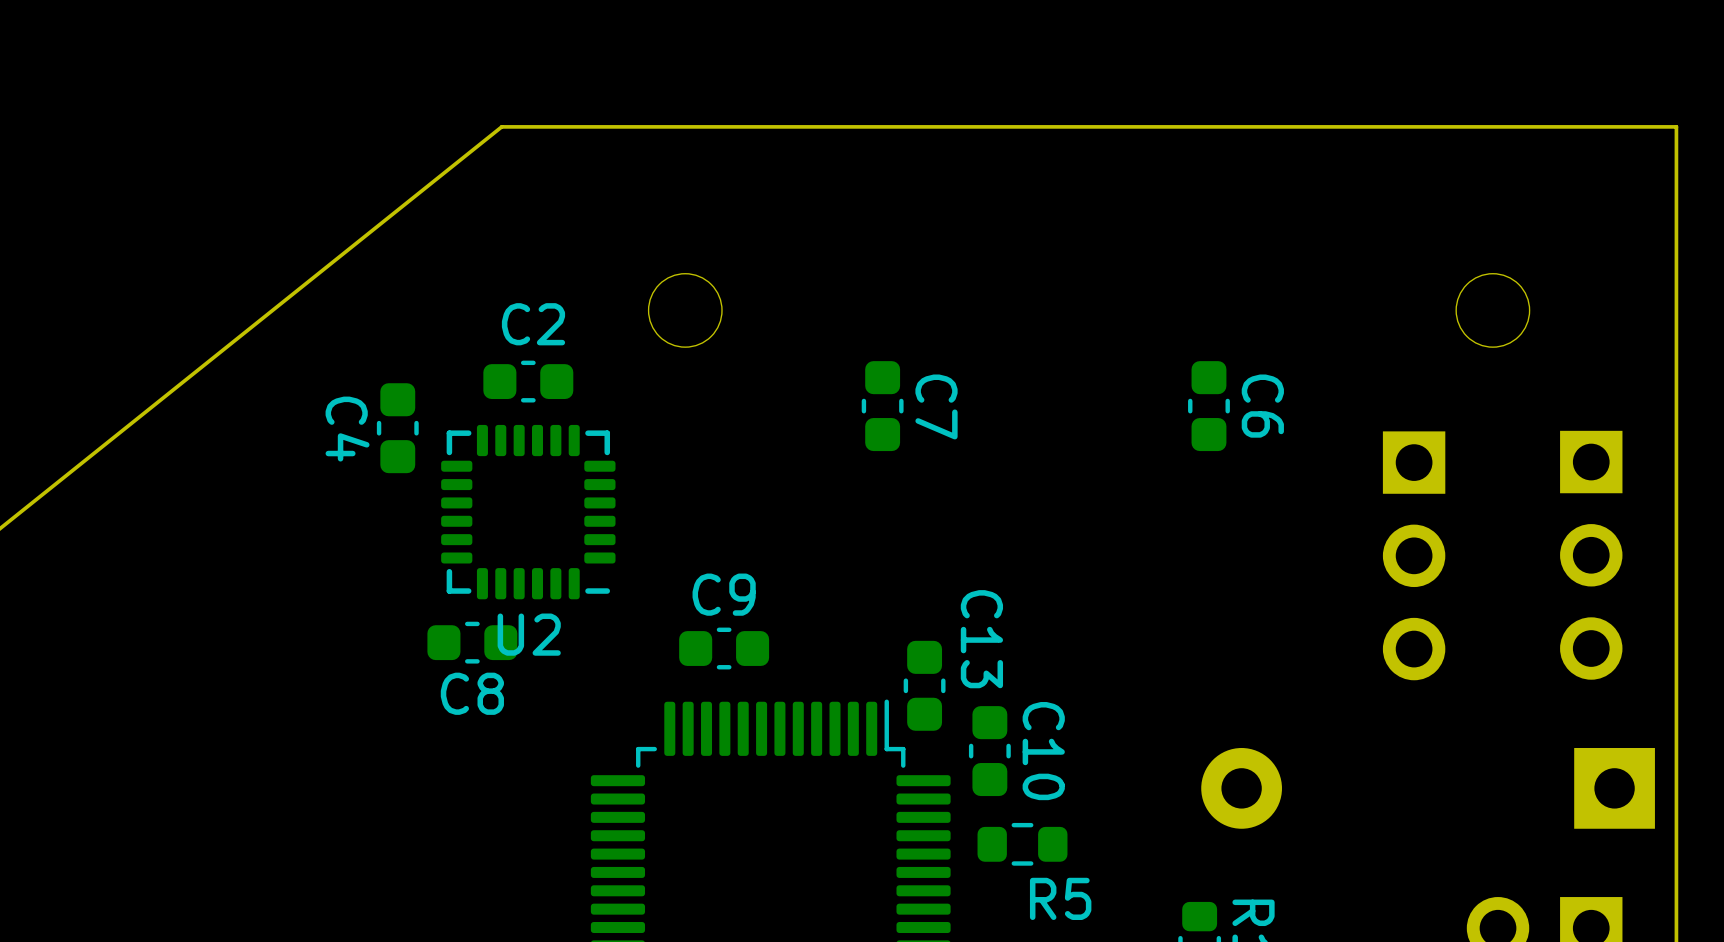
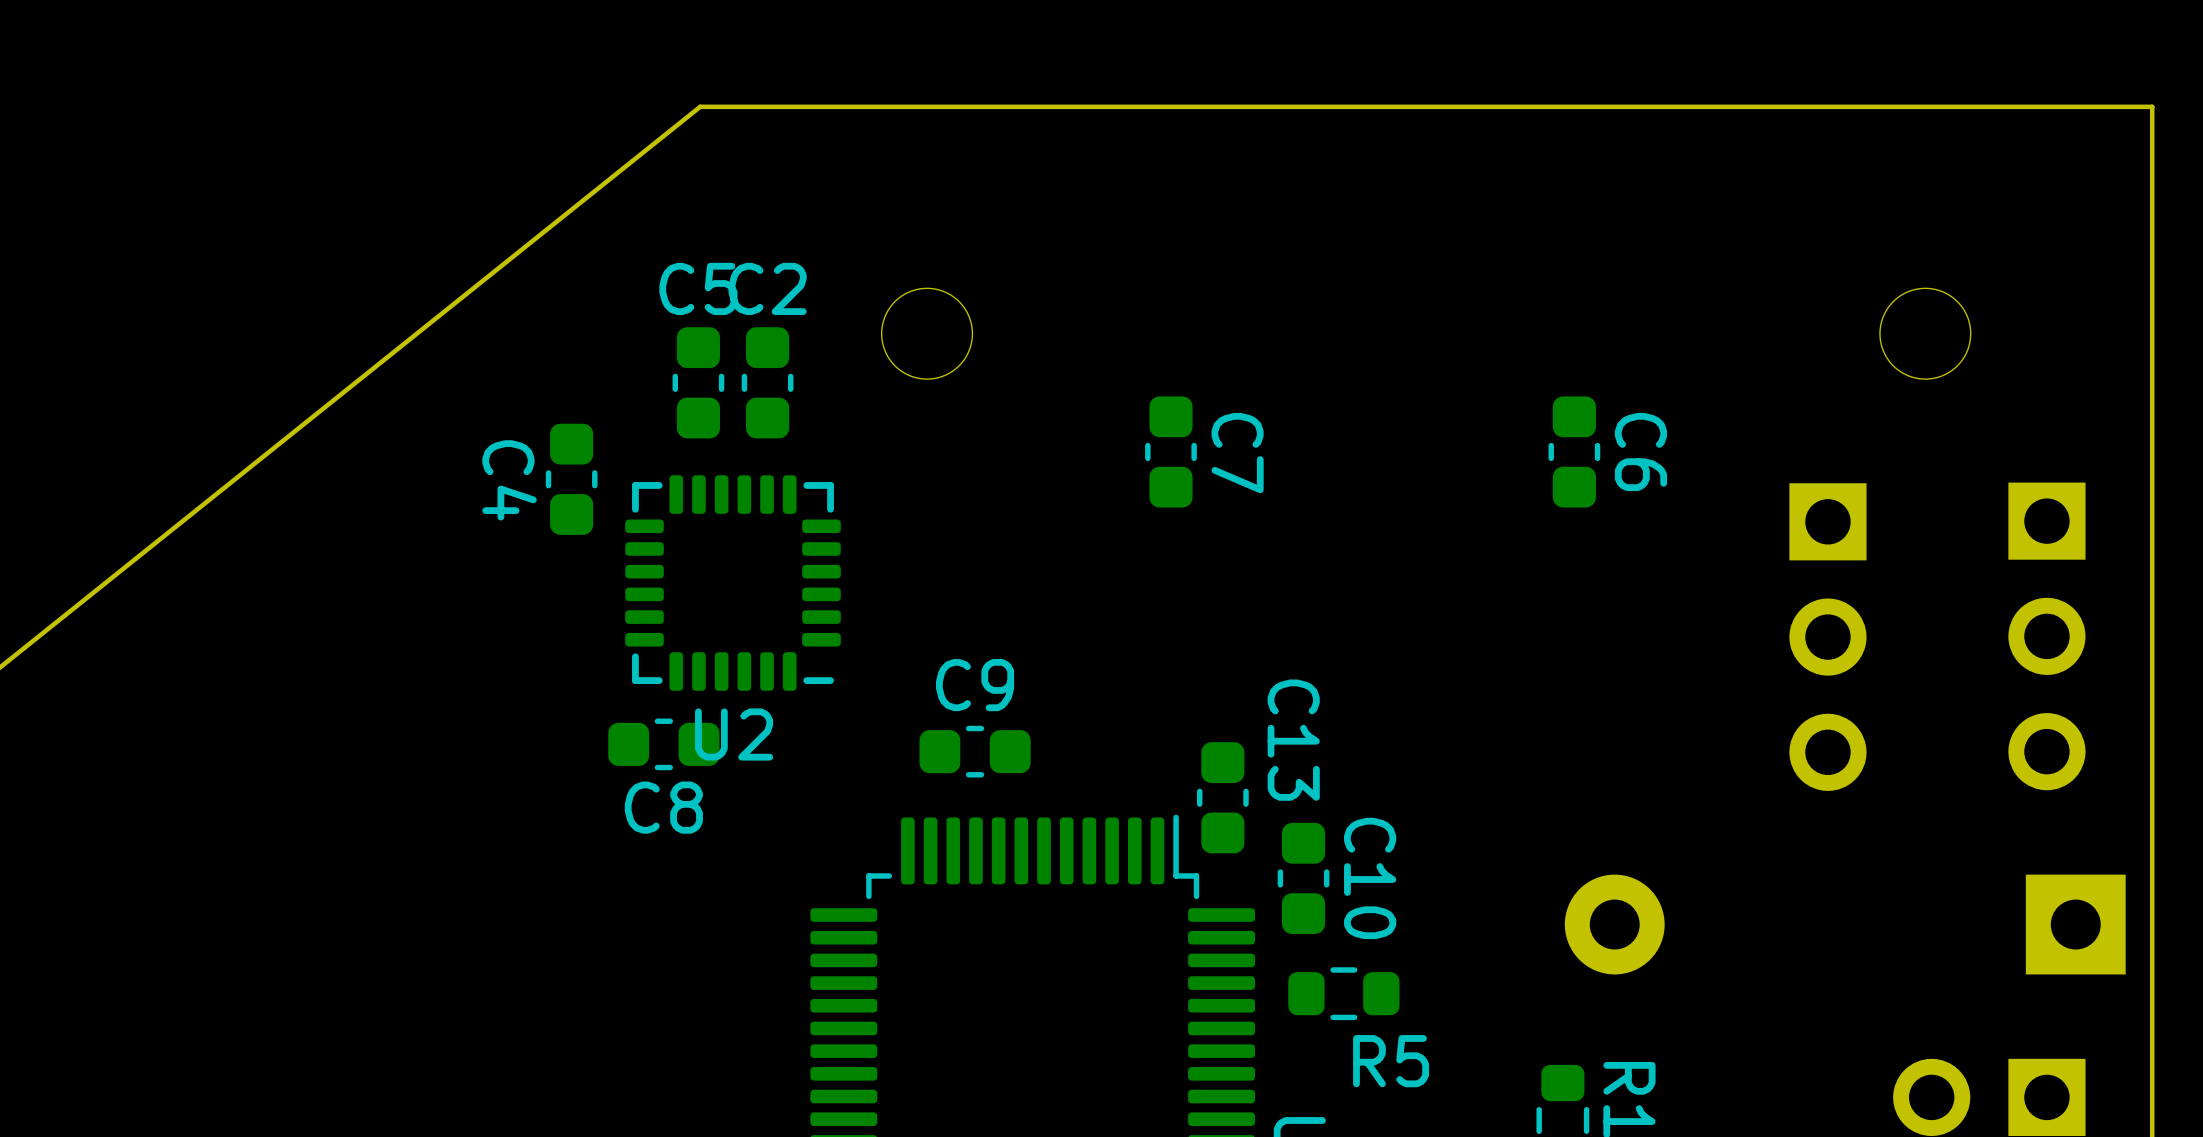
C5: none -> (698, 382)
C2 rotation: 0° (528, 381) -> 90° clockwise (767, 382)

